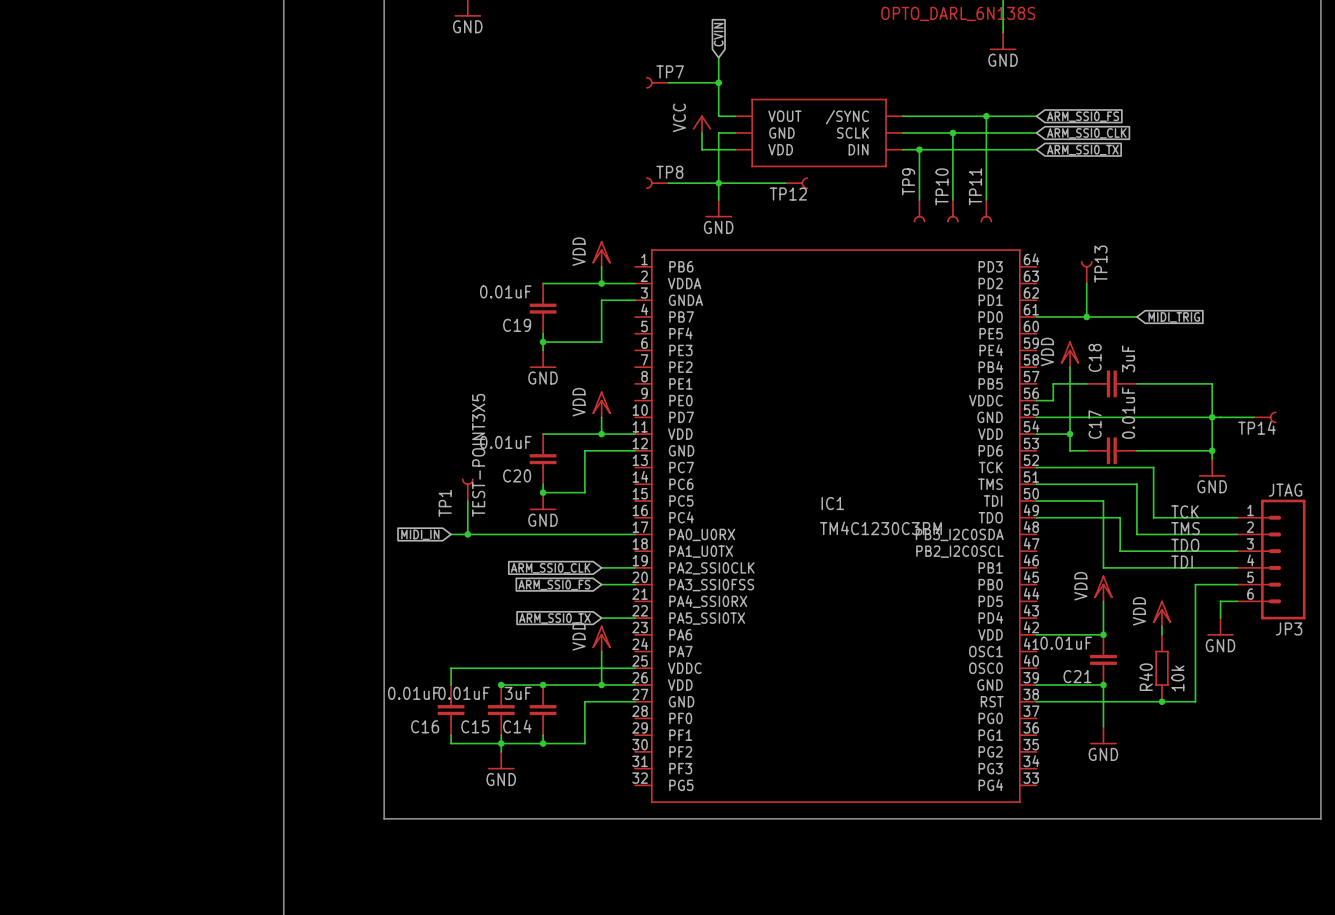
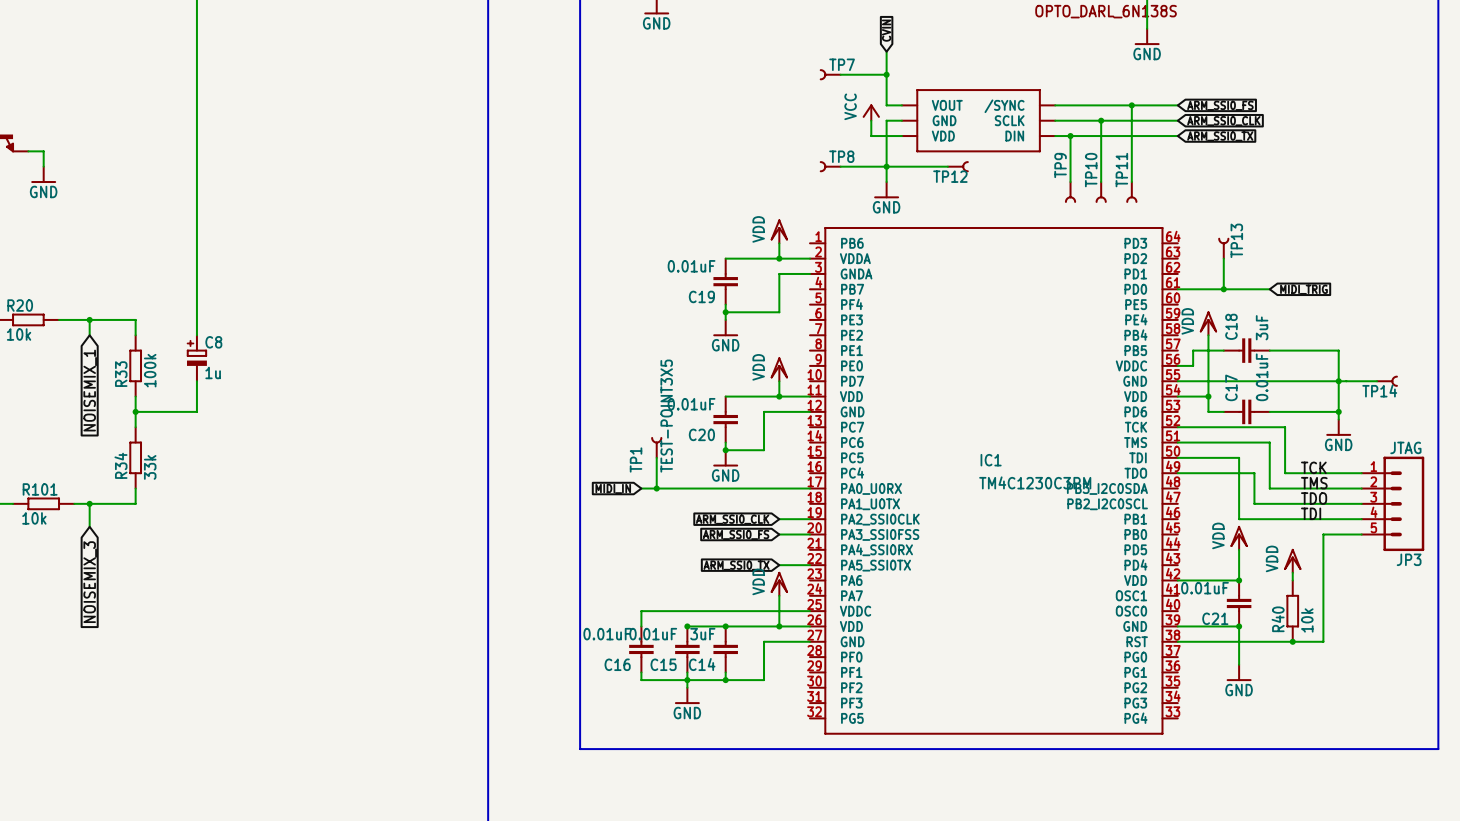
JP3 symbol: [1237, 499, 1306, 620] -> [1361, 456, 1425, 552]
wire: (1237, 601) (1220, 601) (1220, 618) -> none
power symbol: GND (1220, 626) -> none

